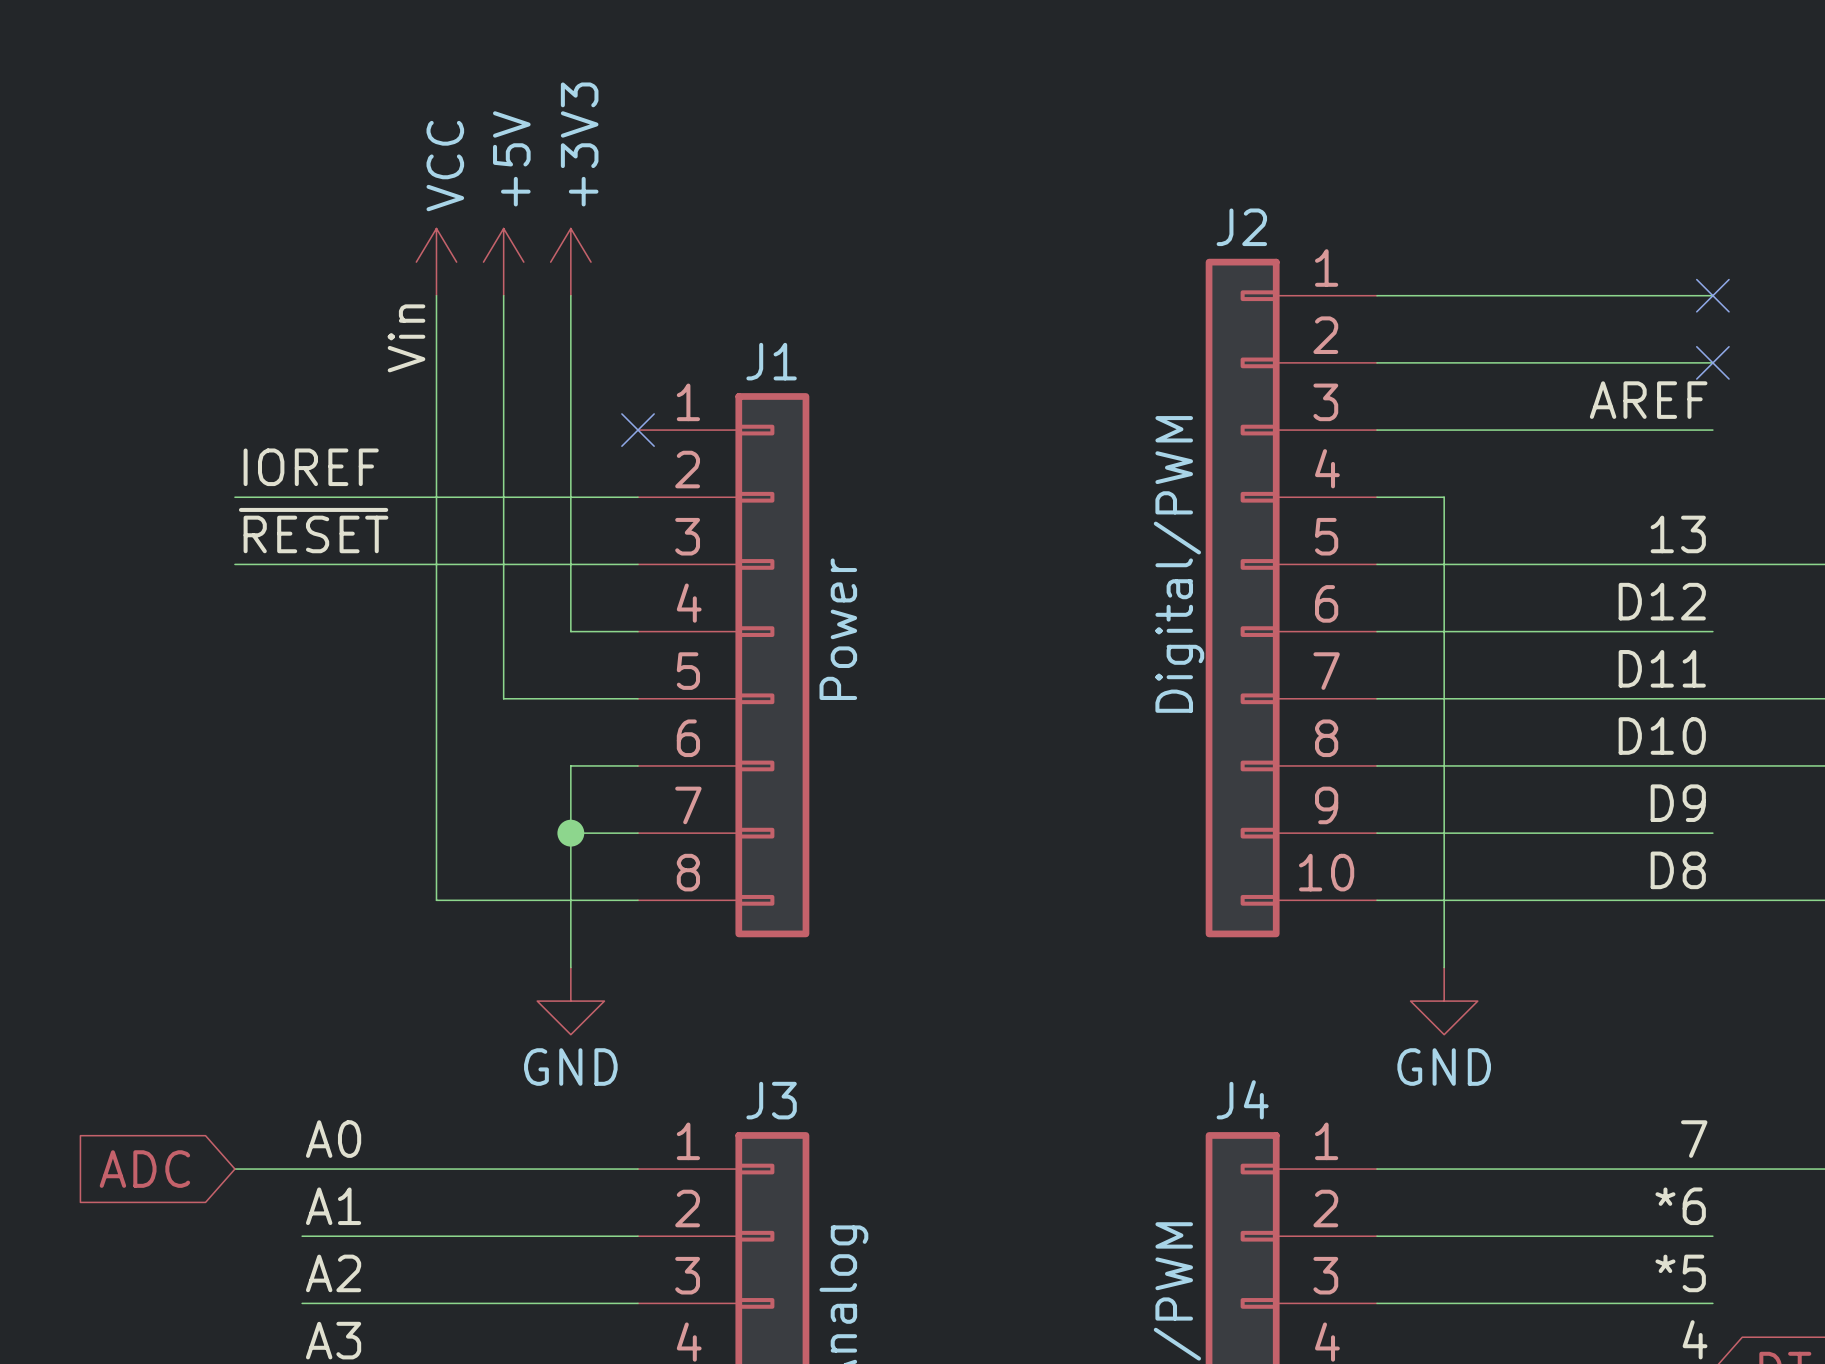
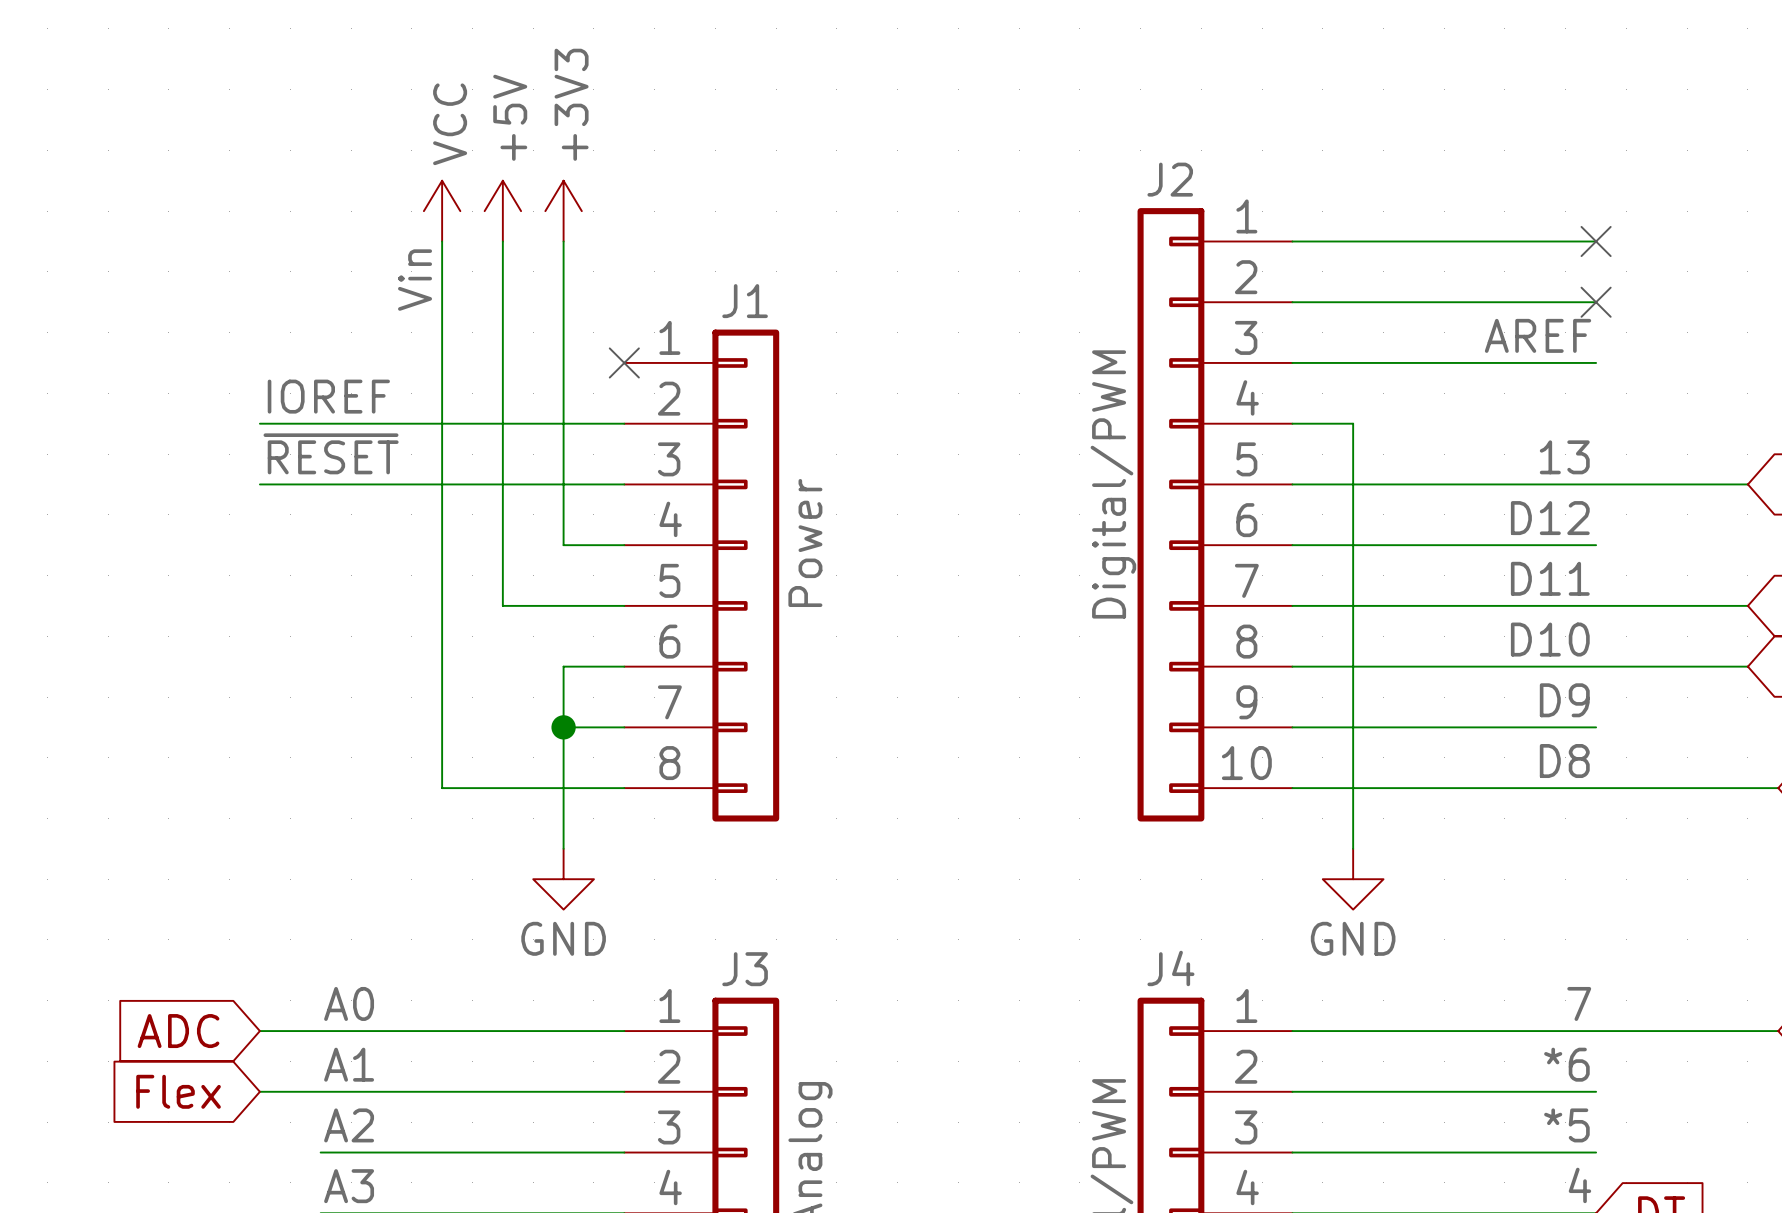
global label: none -> Flex (178, 1091)
wire: none -> (259, 1091) (320, 1091)

